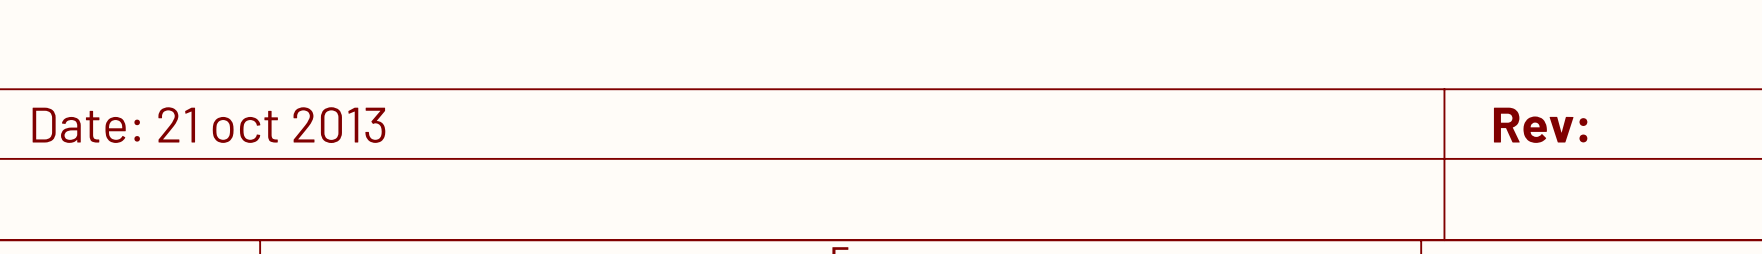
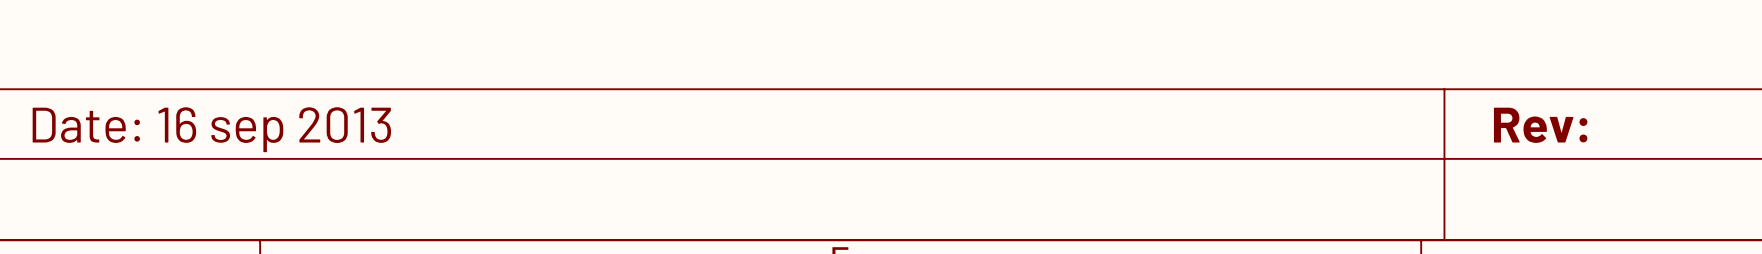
title block: Date: 21 oct 2013 (208, 125) -> Date: 16 sep 2013 (211, 129)

